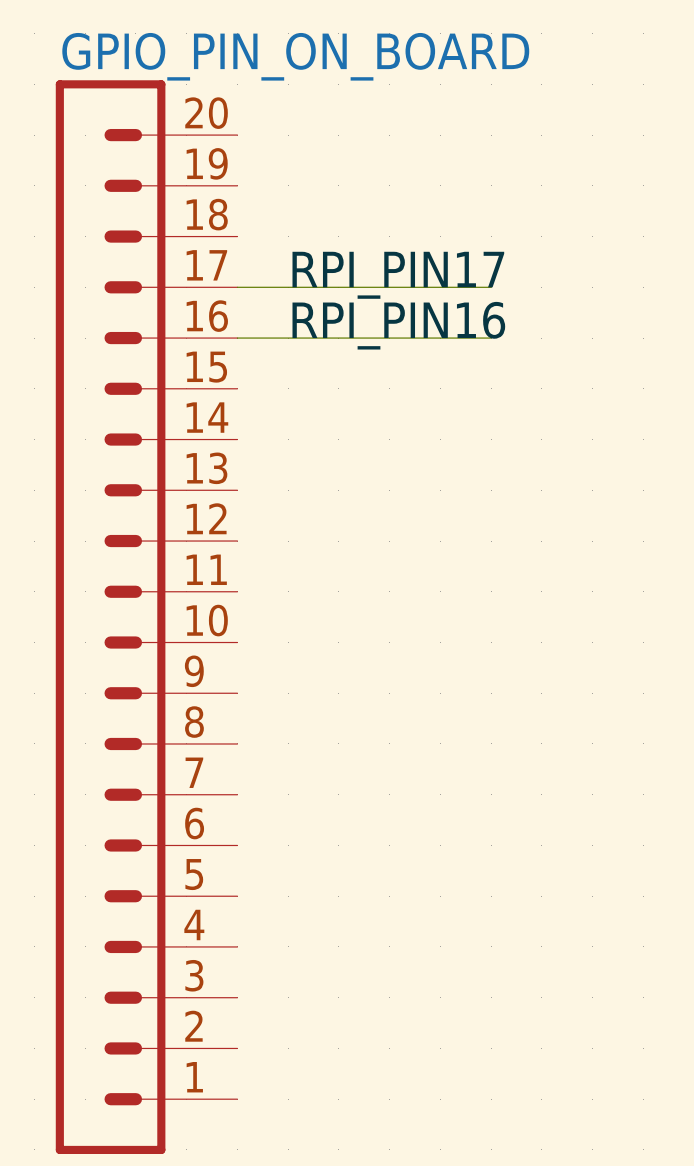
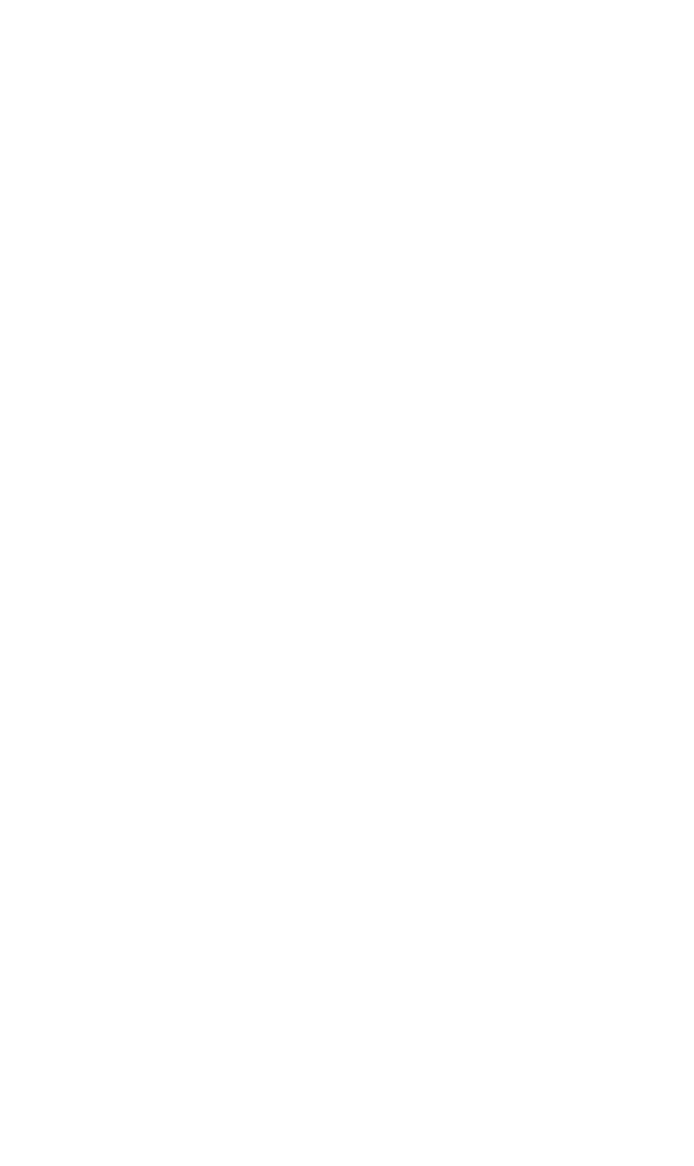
label: RPI_PIN17 (398, 275) -> none
wire: (237, 287) (491, 287) -> none
label: RPI_PIN16 (398, 325) -> none
wire: (237, 338) (491, 338) -> none
GPIO_PIN_ON_BOARD: (146, 617) -> none

